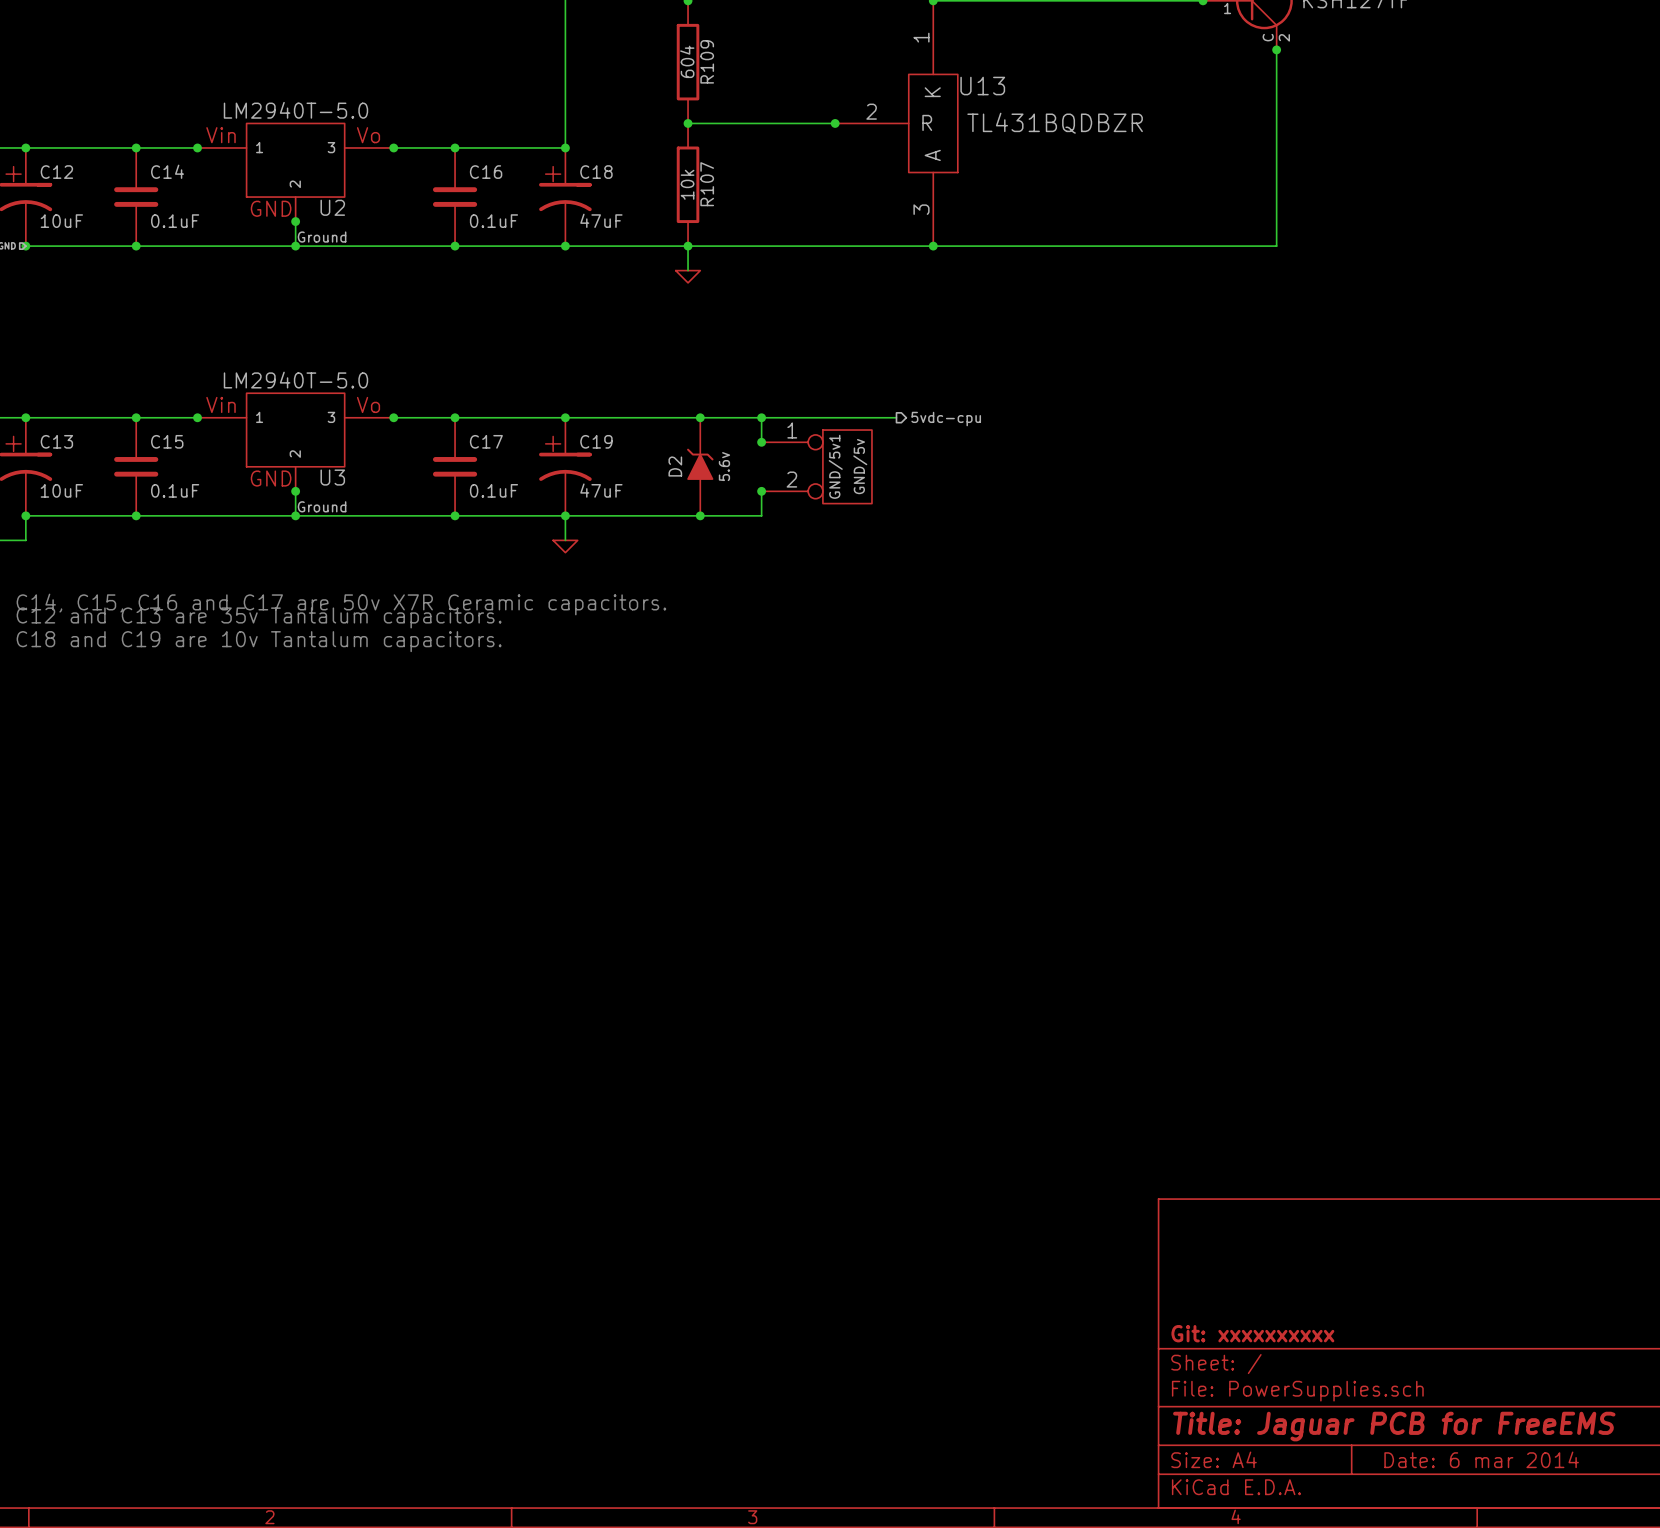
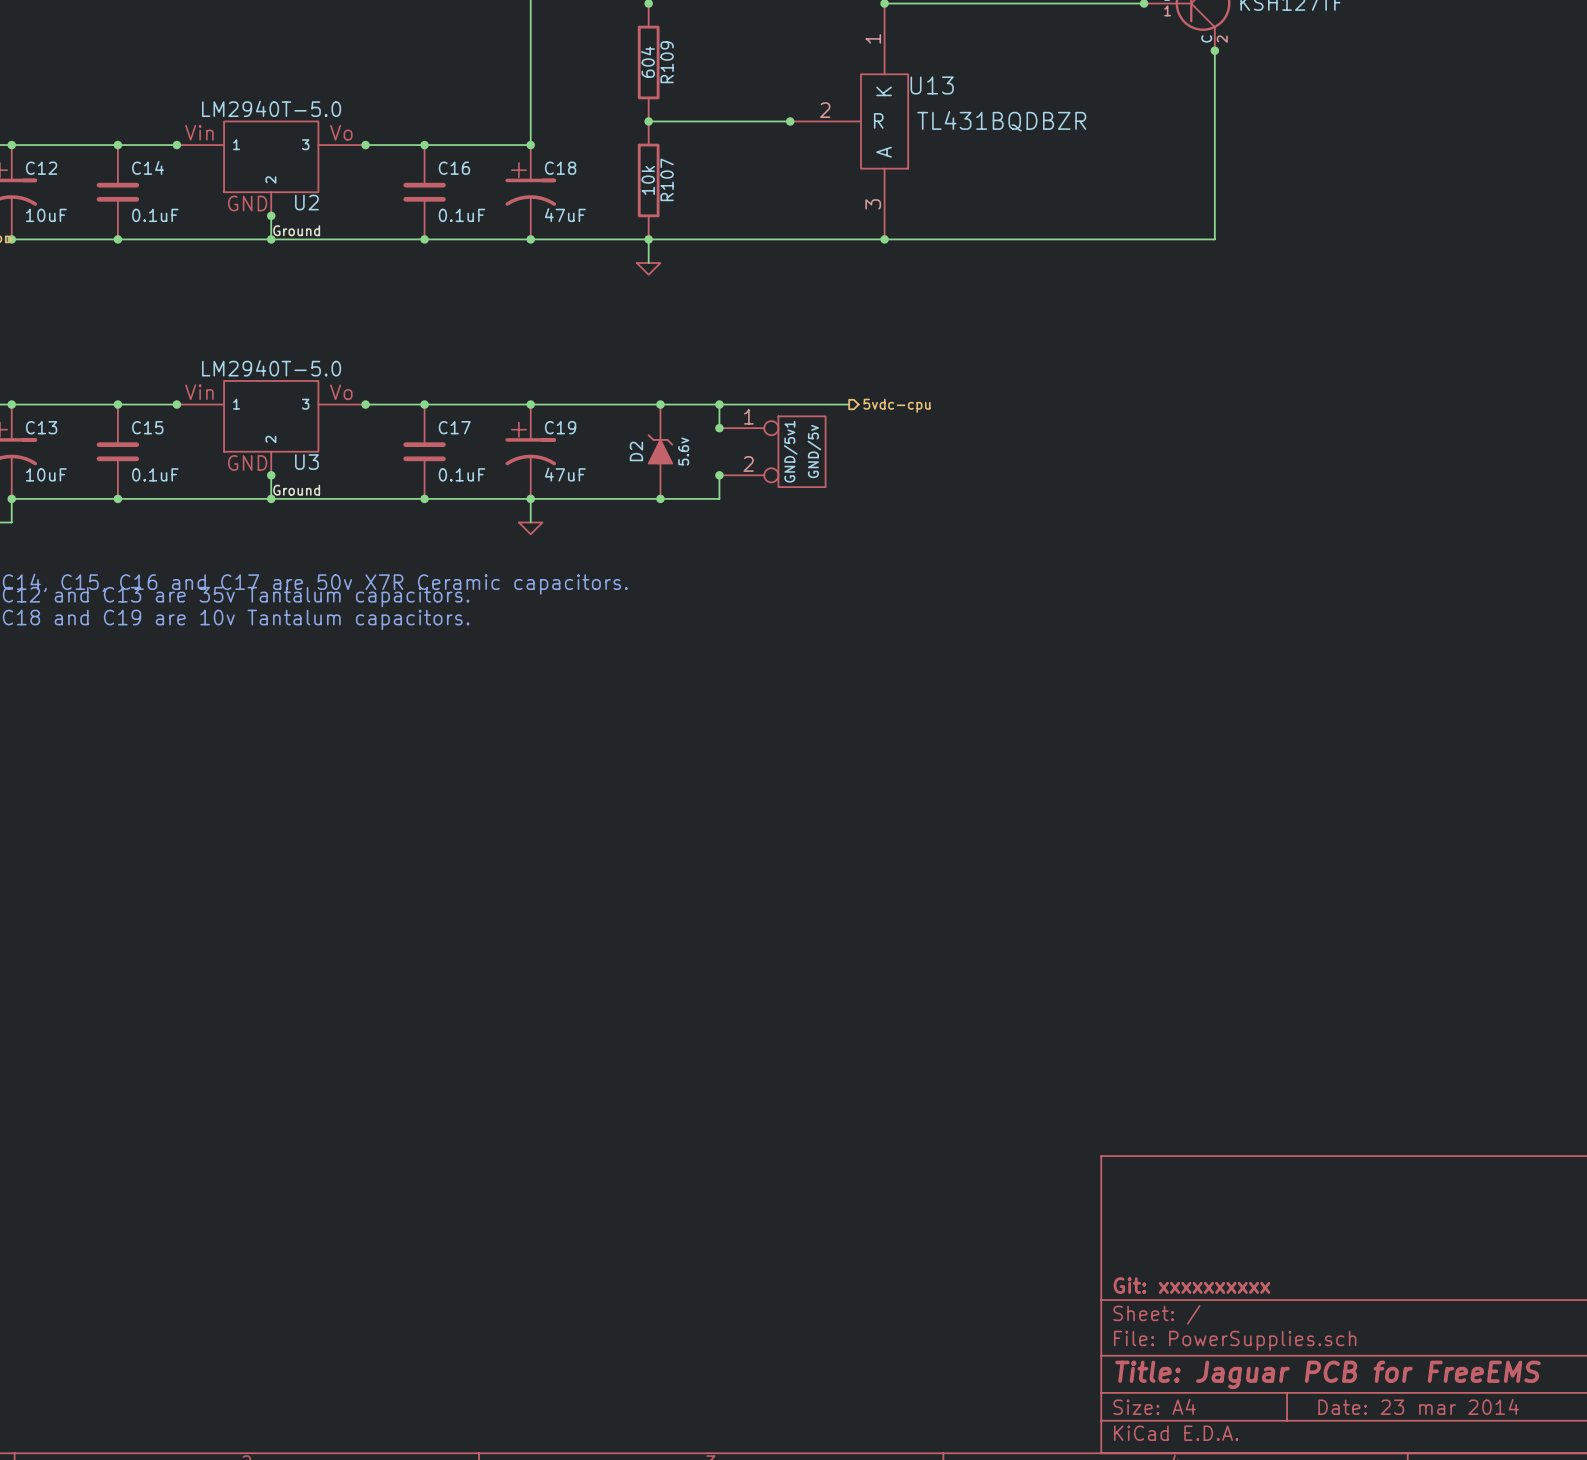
title block: Date: 6 mar 2014 (1481, 1459) -> Date: 23 mar 2014 (1418, 1406)

